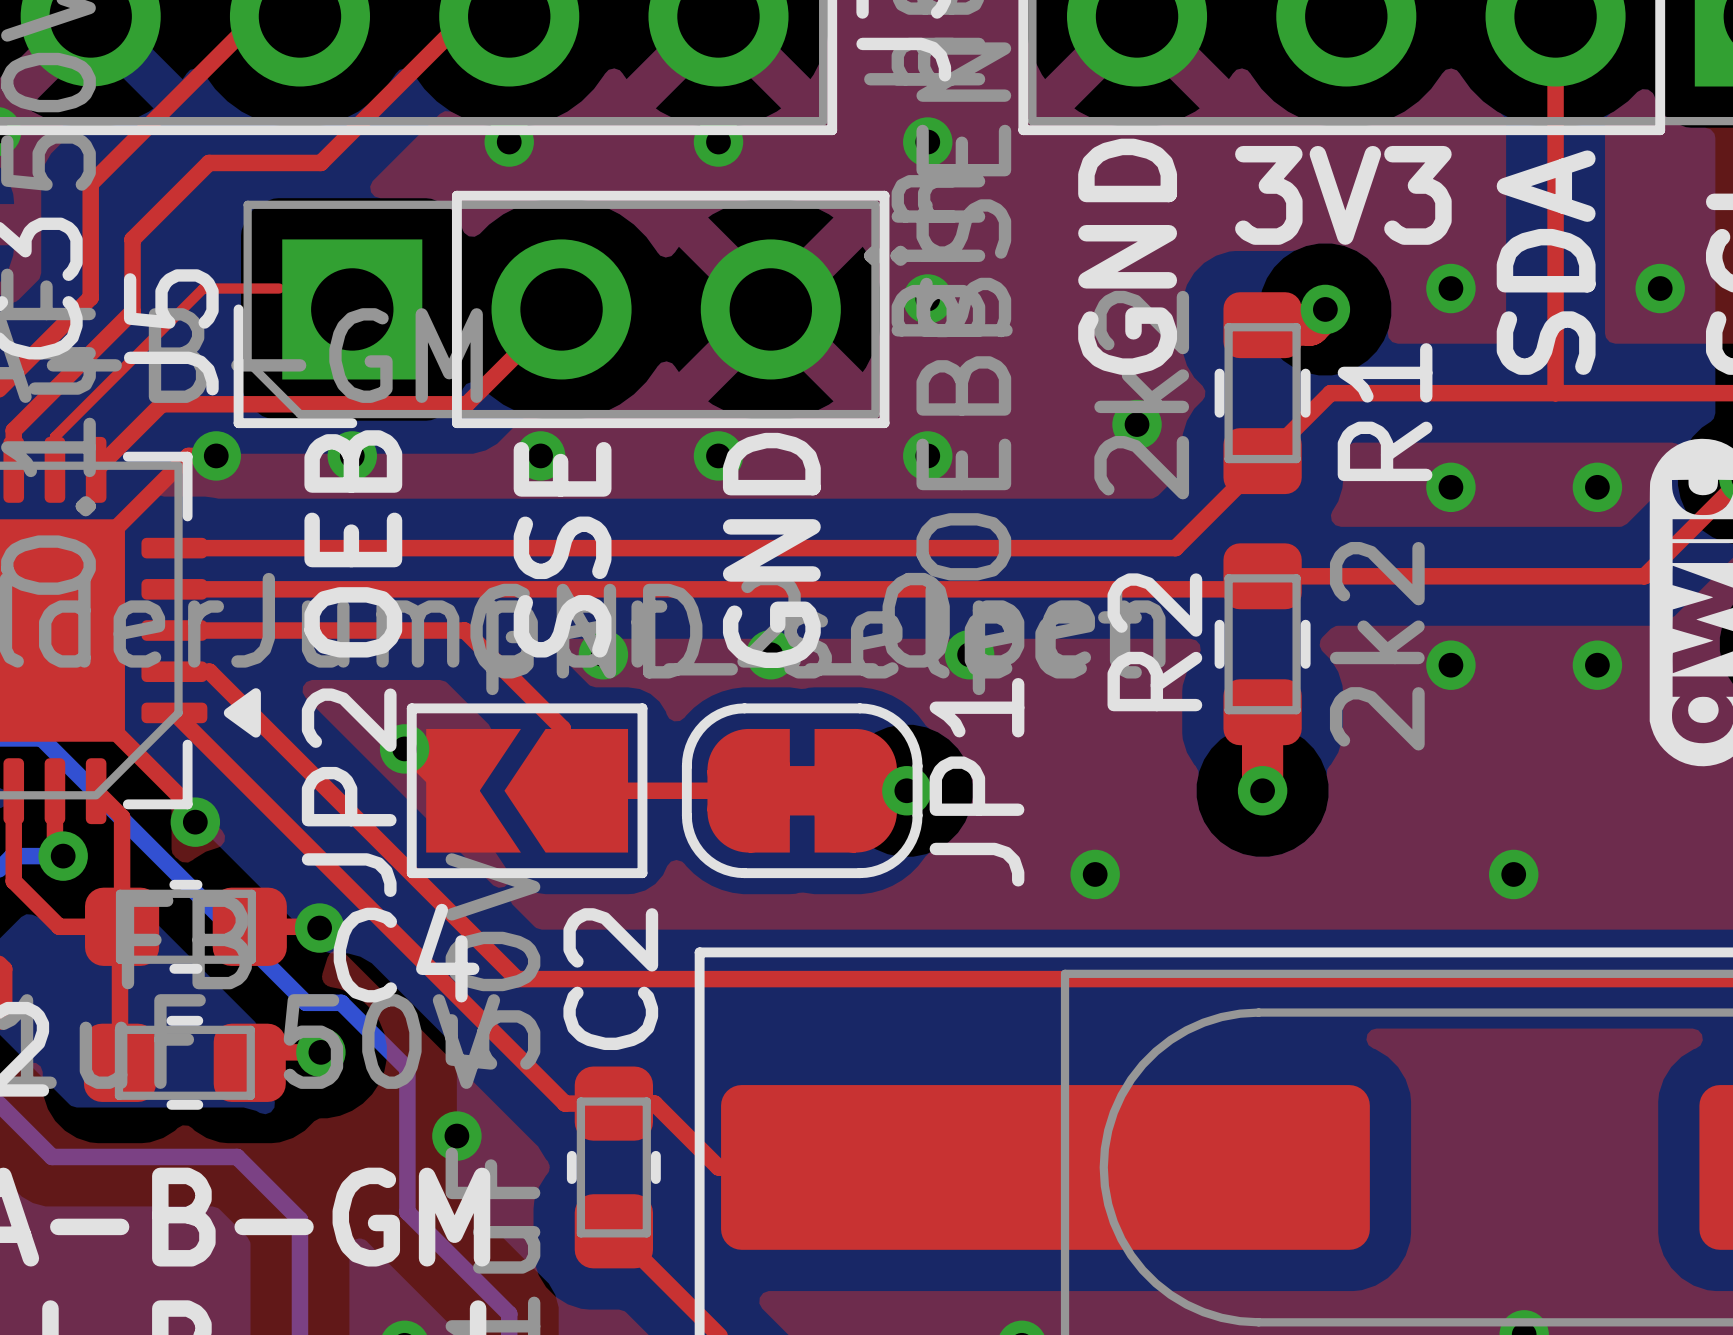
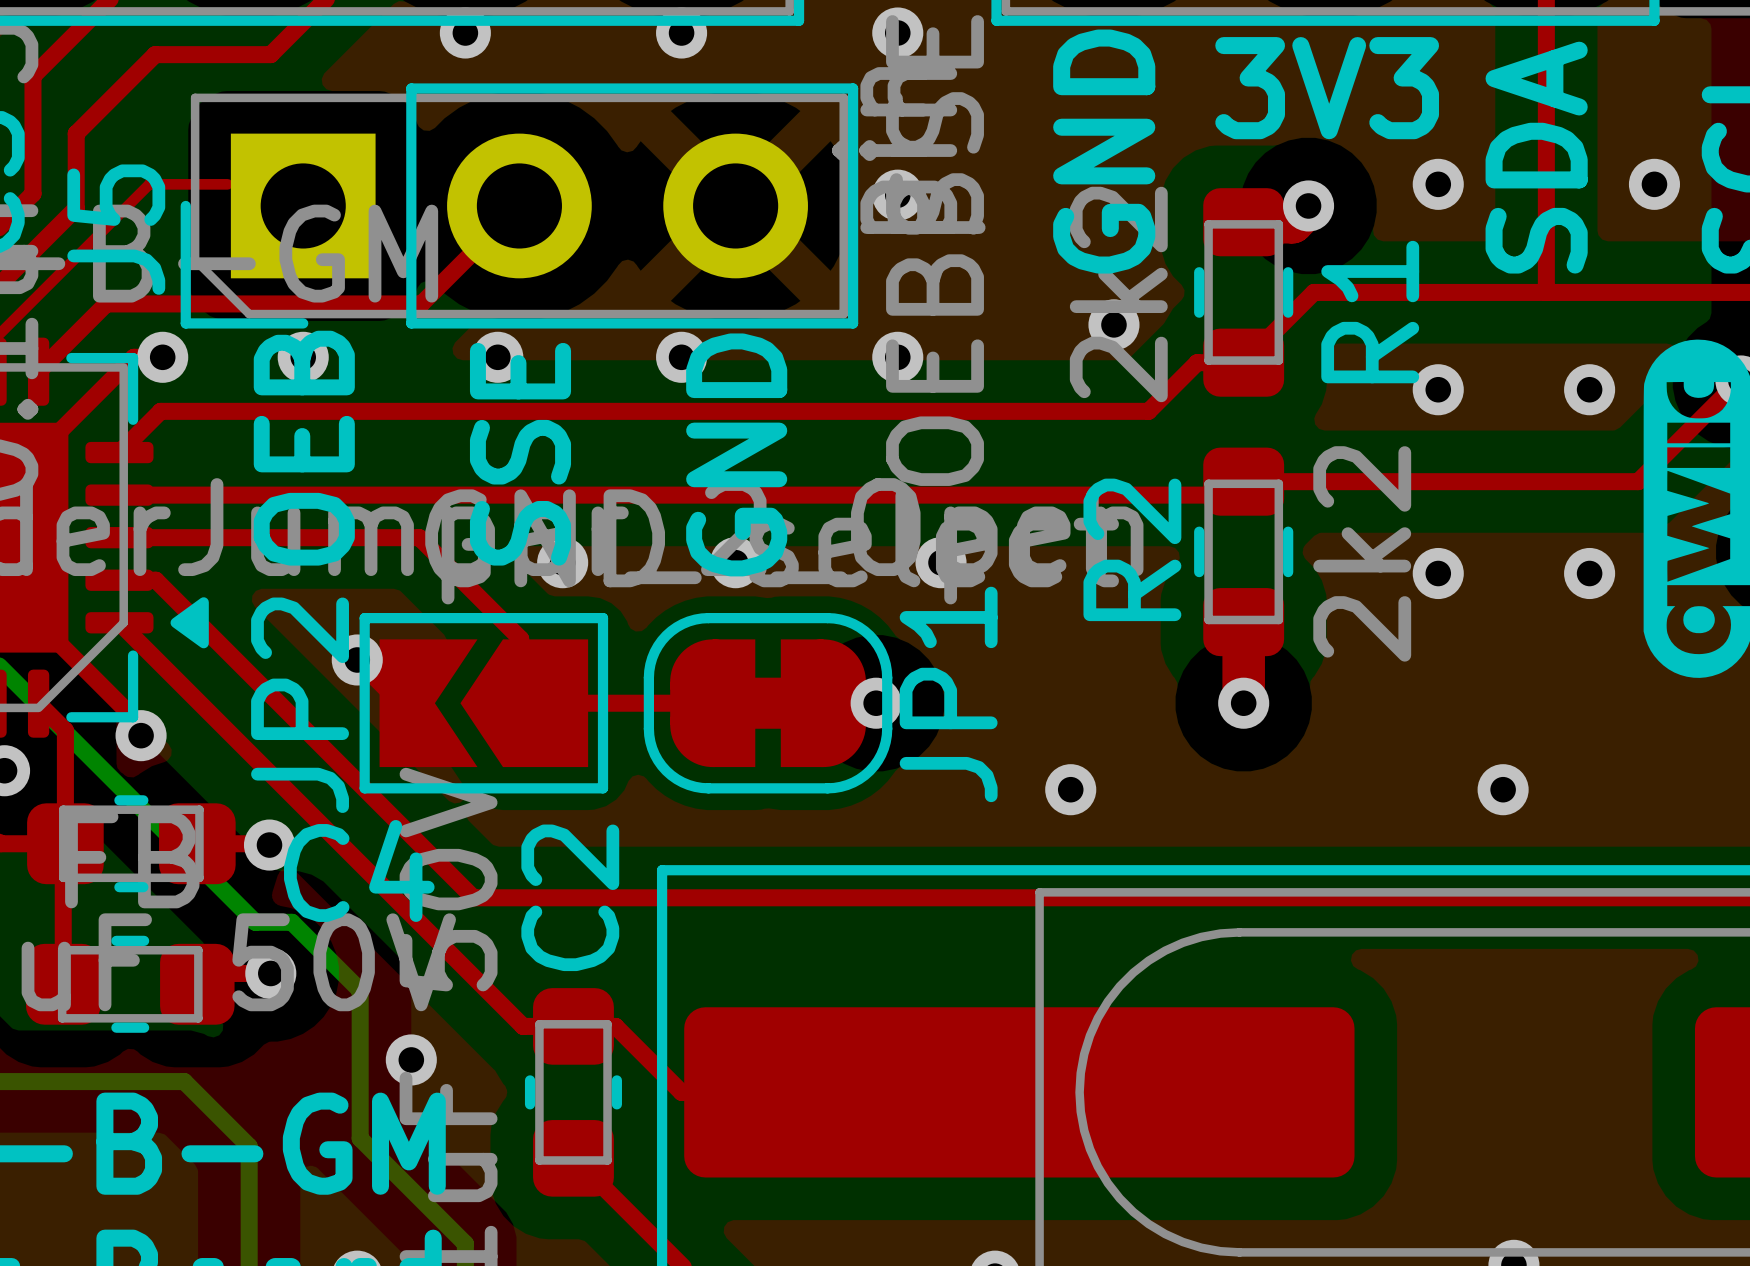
top track: (1262, 461) (1175, 548) (174, 548) -> (1243, 362) (1197, 362) (1148, 411) (160, 411) (119, 452)

